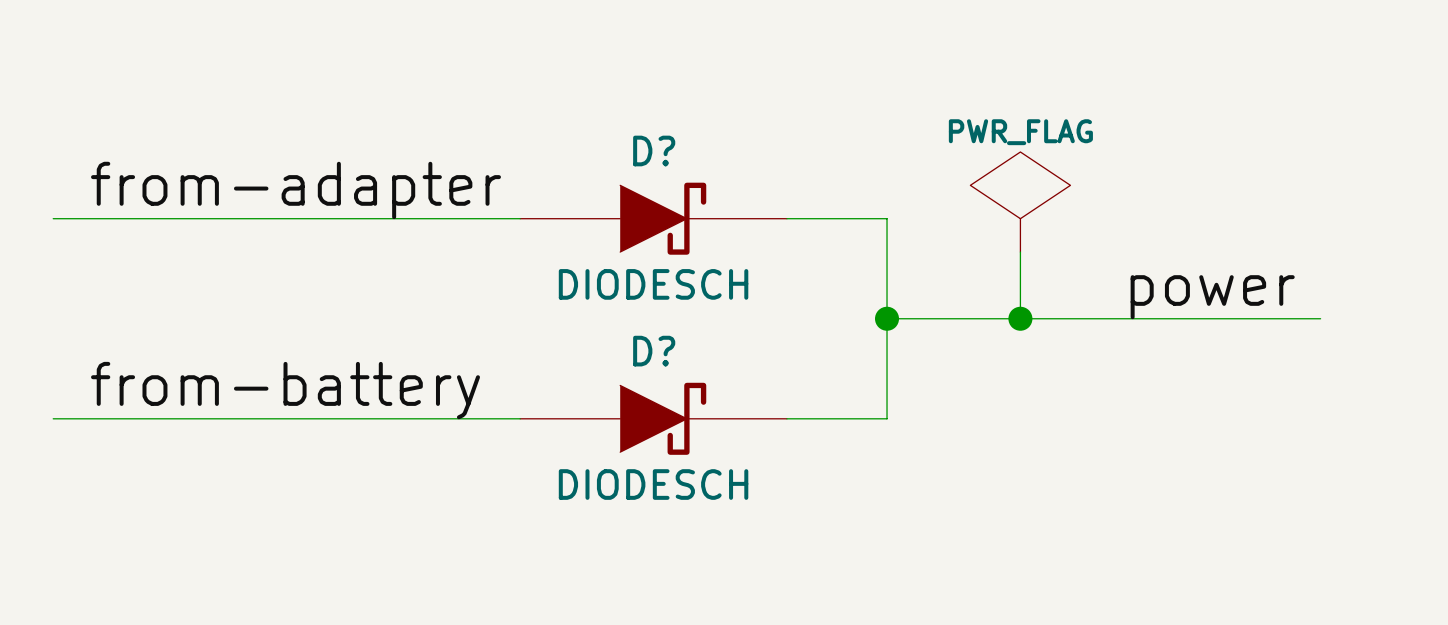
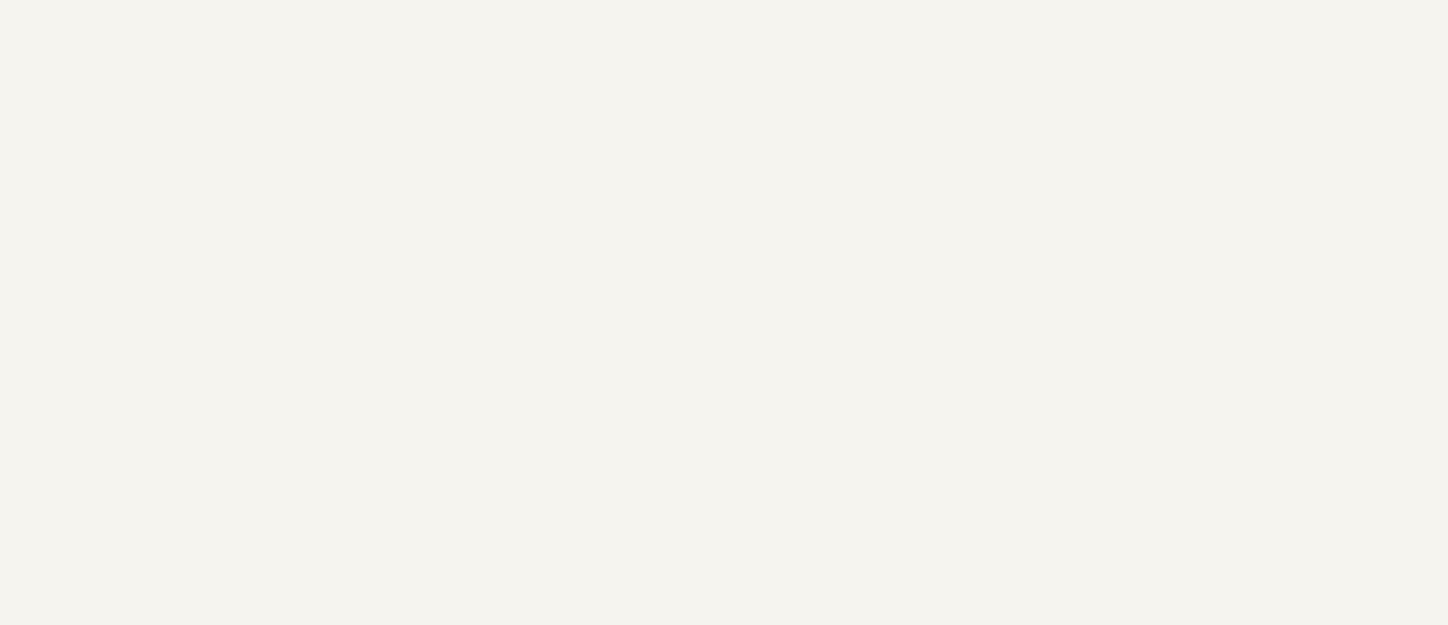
label: from-adapter (295, 190) -> none
power symbol: PWR_FLAG (1020, 202) -> none
wire: (53, 218) (520, 218) -> none
D?: DIODESCH (653, 218) -> none
wire: (786, 218) (887, 218) (887, 418) (786, 418) -> none
wire: (1020, 252) (1020, 318) -> none
label: power (1212, 297) -> none
wire: (887, 318) (1320, 318) -> none
junction: (887, 318) -> none
junction: (1020, 318) -> none
label: from-battery (285, 390) -> none
wire: (53, 418) (520, 418) -> none
D?: DIODESCH (653, 418) -> none

